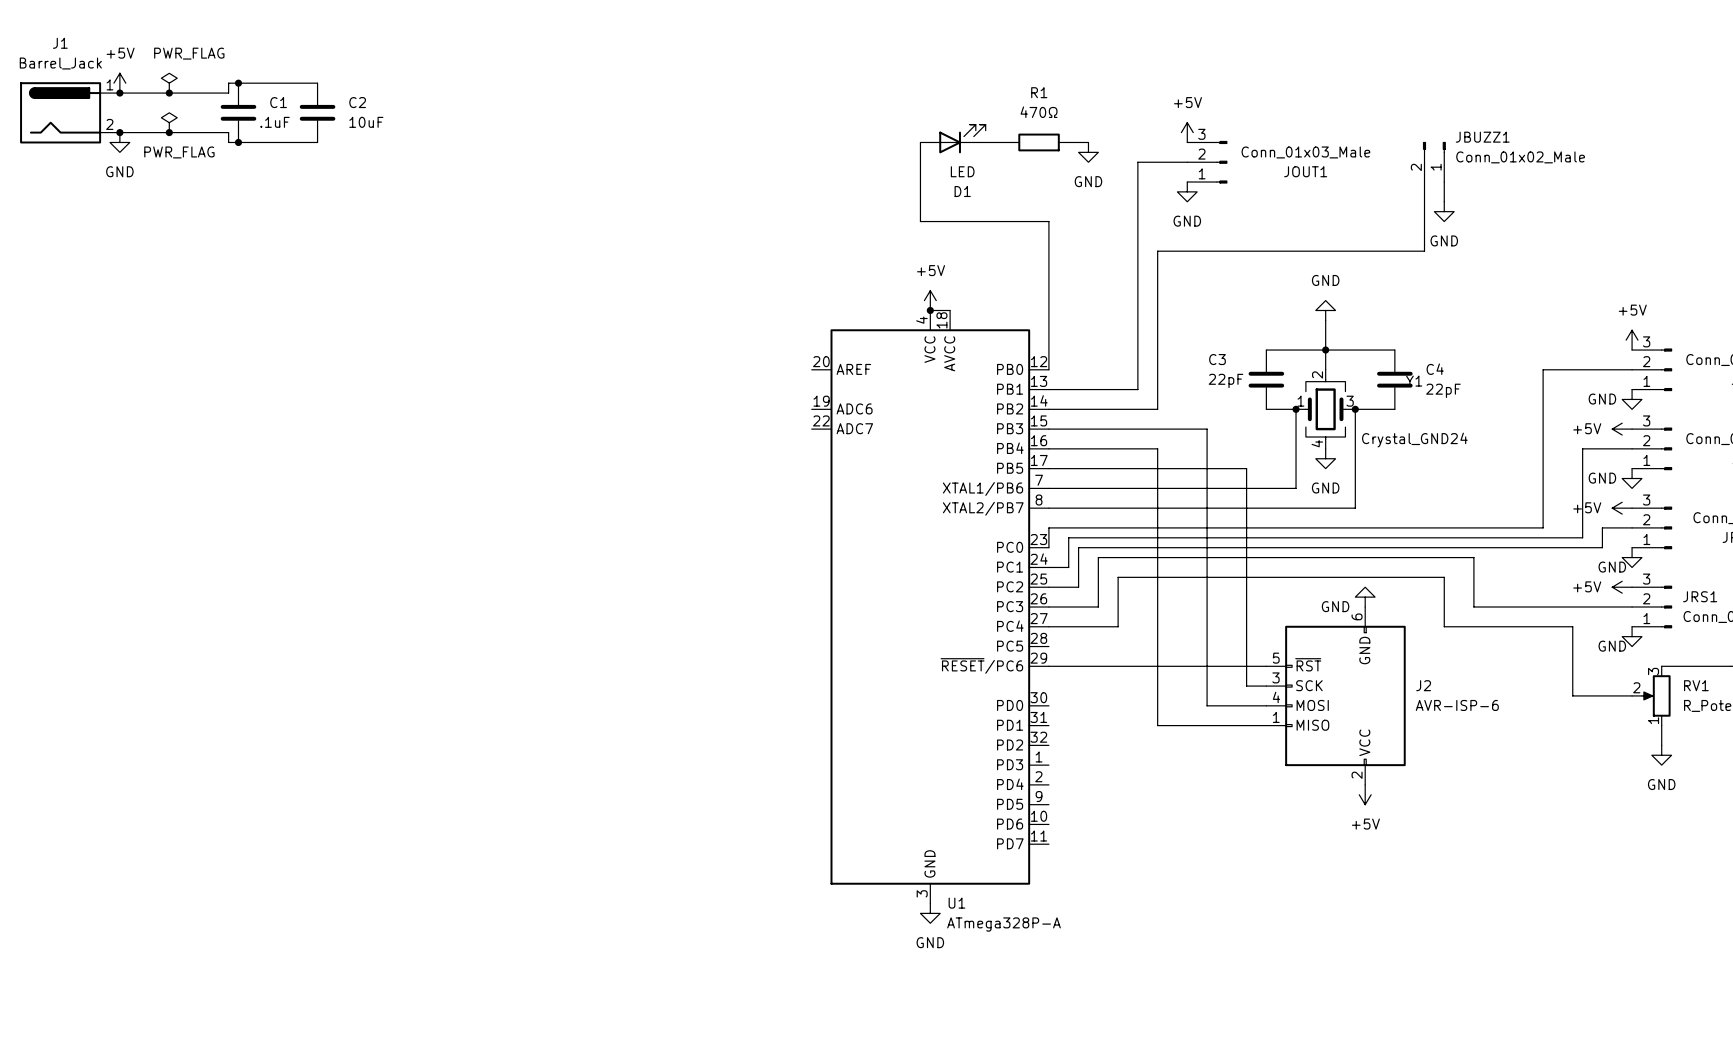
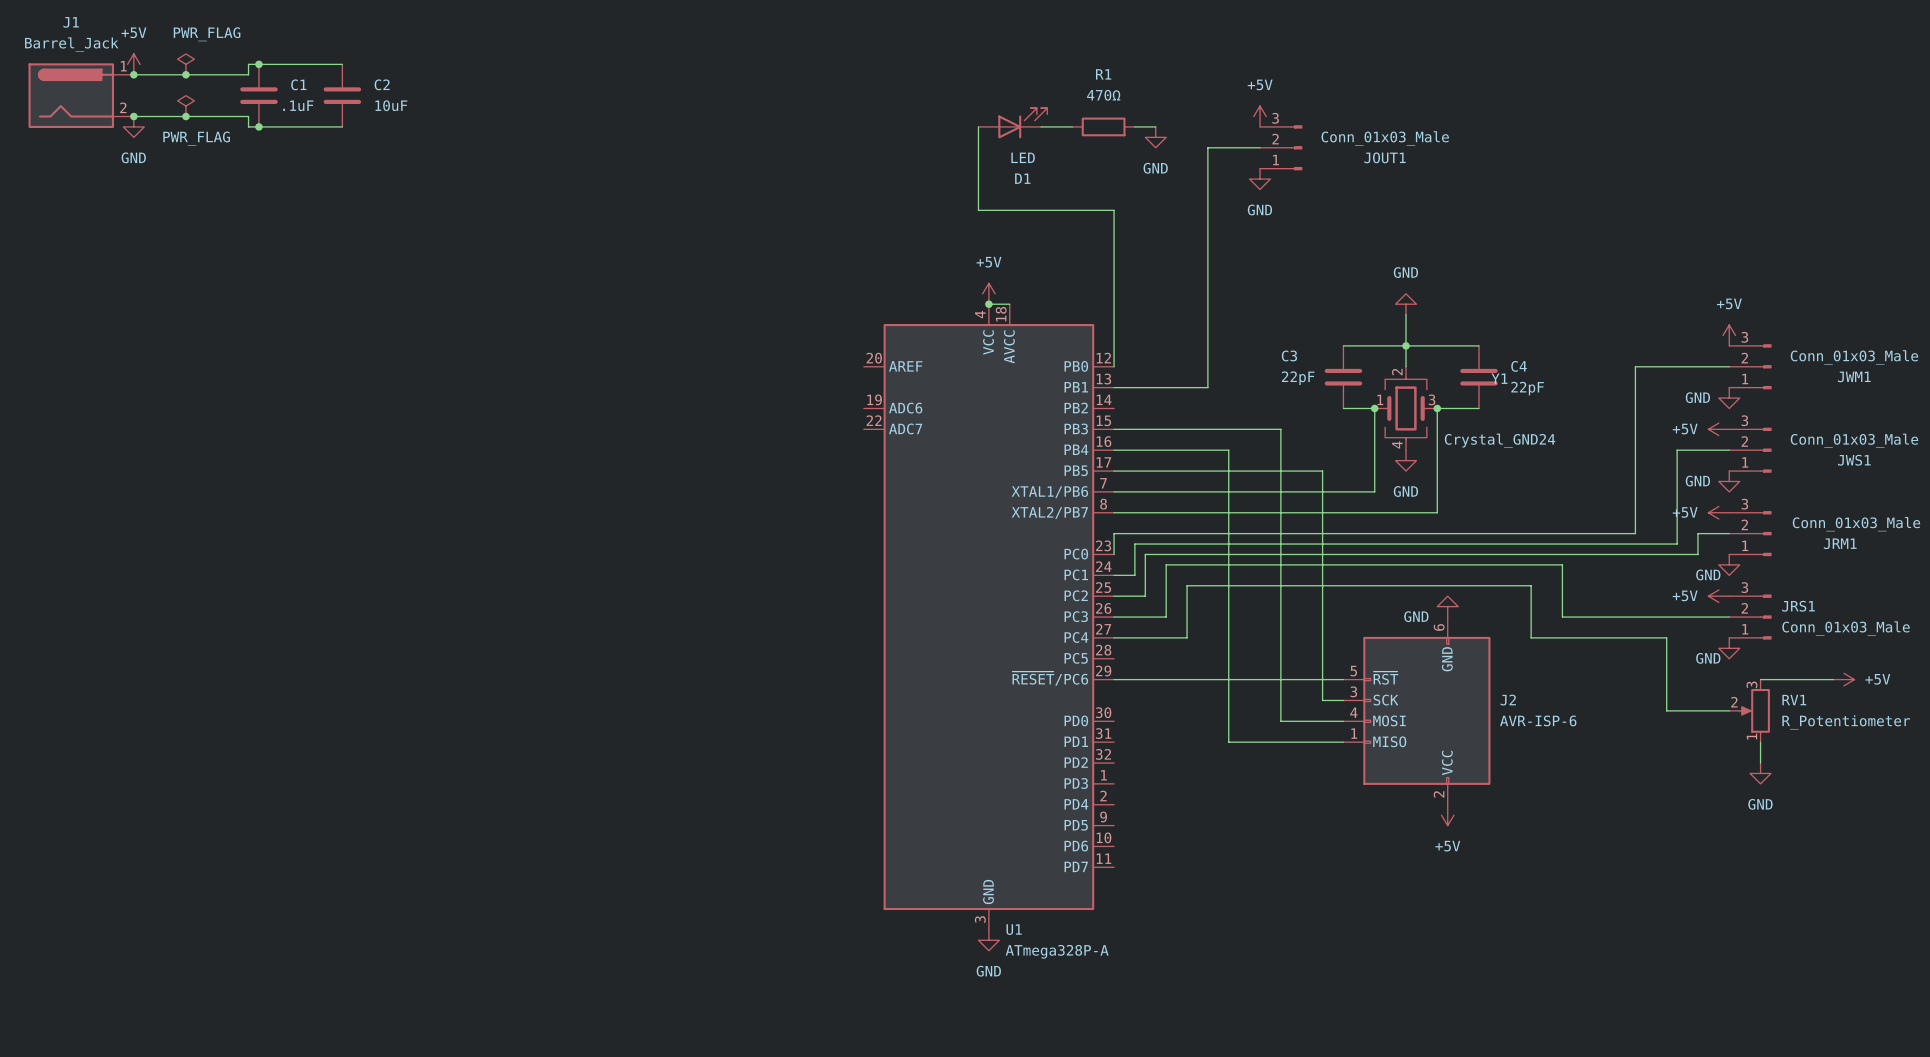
JBUZZ1: Conn_01x02_Male (1434, 161) -> none
wire: (1424, 182) (1424, 251) (1157, 251) (1157, 409) (1048, 409) -> none
wire: (1444, 182) (1444, 201) -> none
power symbol: GND (1444, 211) -> none

